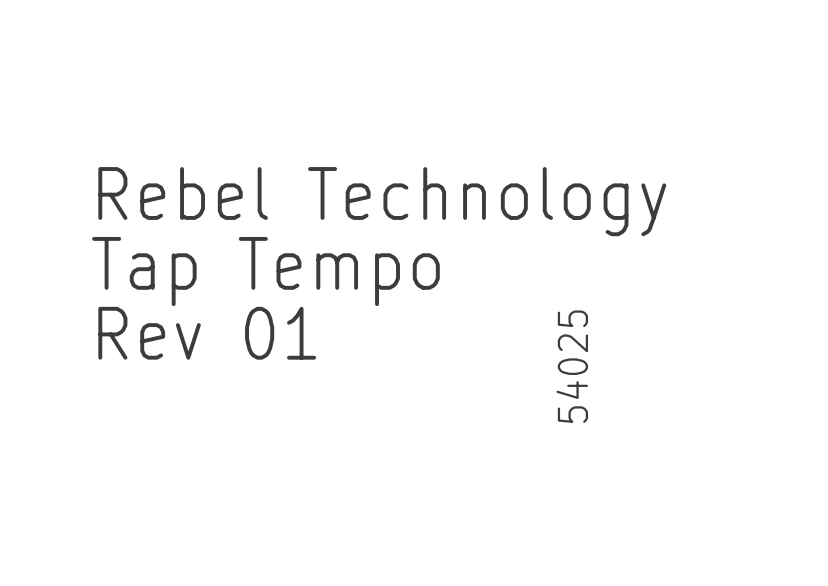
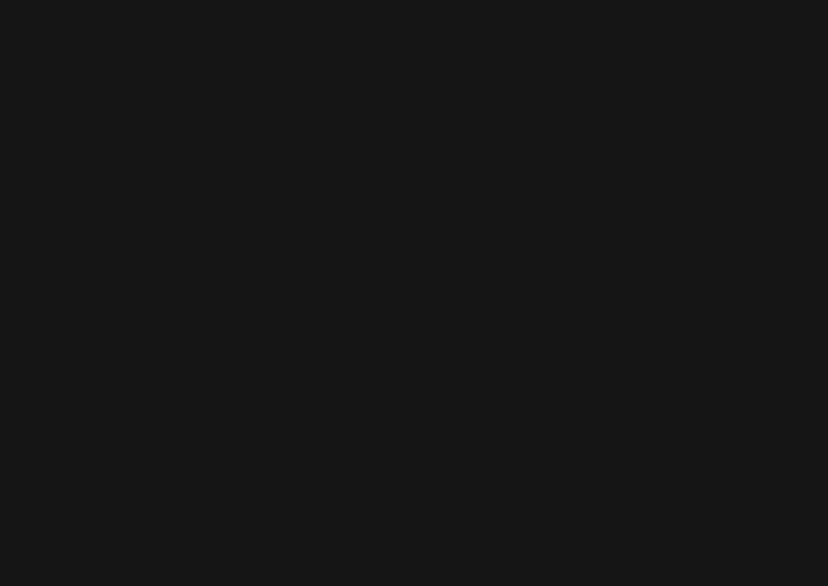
text: Rebel Technology (382, 201) -> none
text: Tap Tempo (265, 271) -> none
text: Rev 01 (207, 333) -> none
text: 54025 (572, 366) -> none

